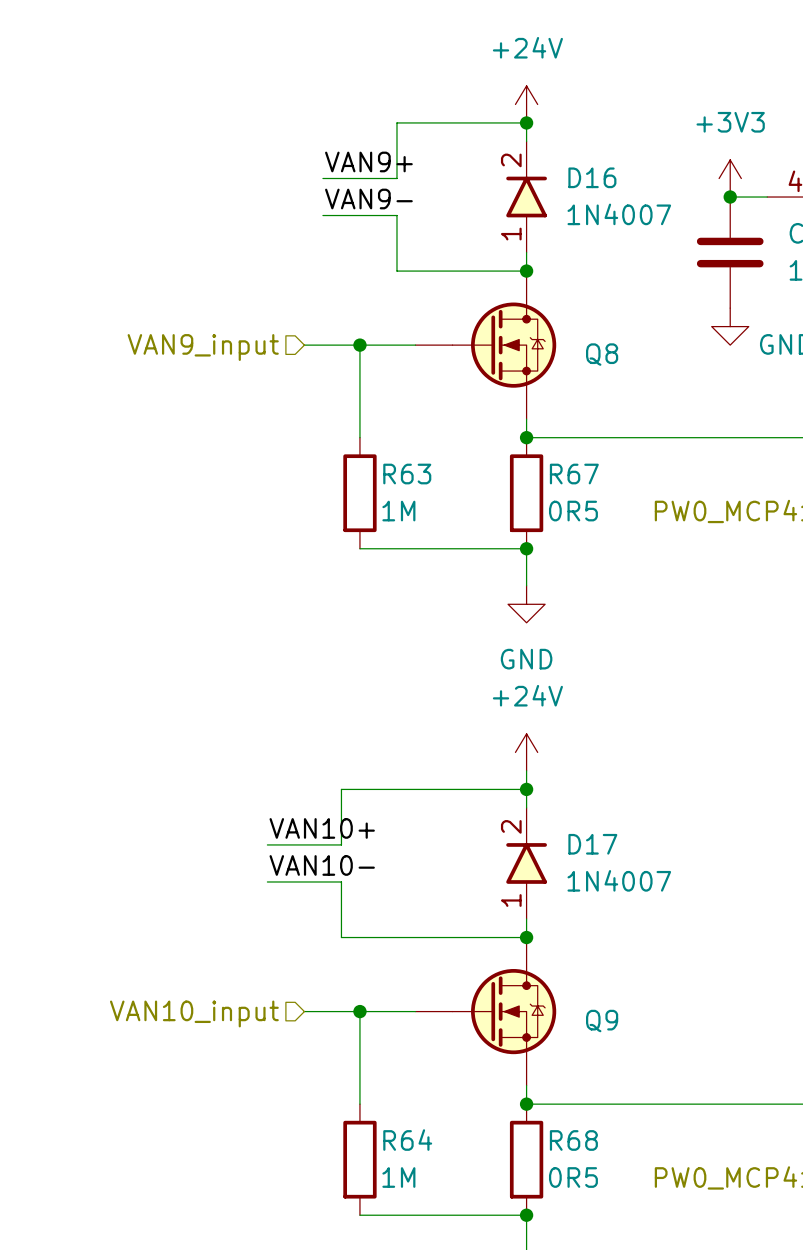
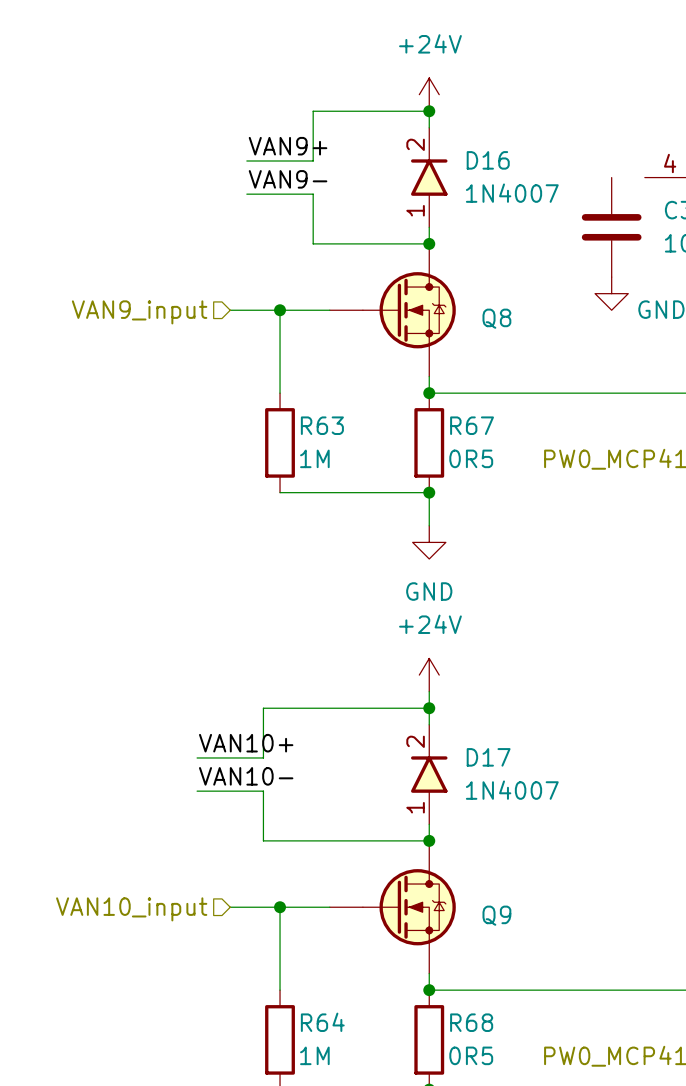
power symbol: +3V3 (730, 178) -> none
wire: (730, 197) (767, 197) -> none
junction: (730, 197) -> none

